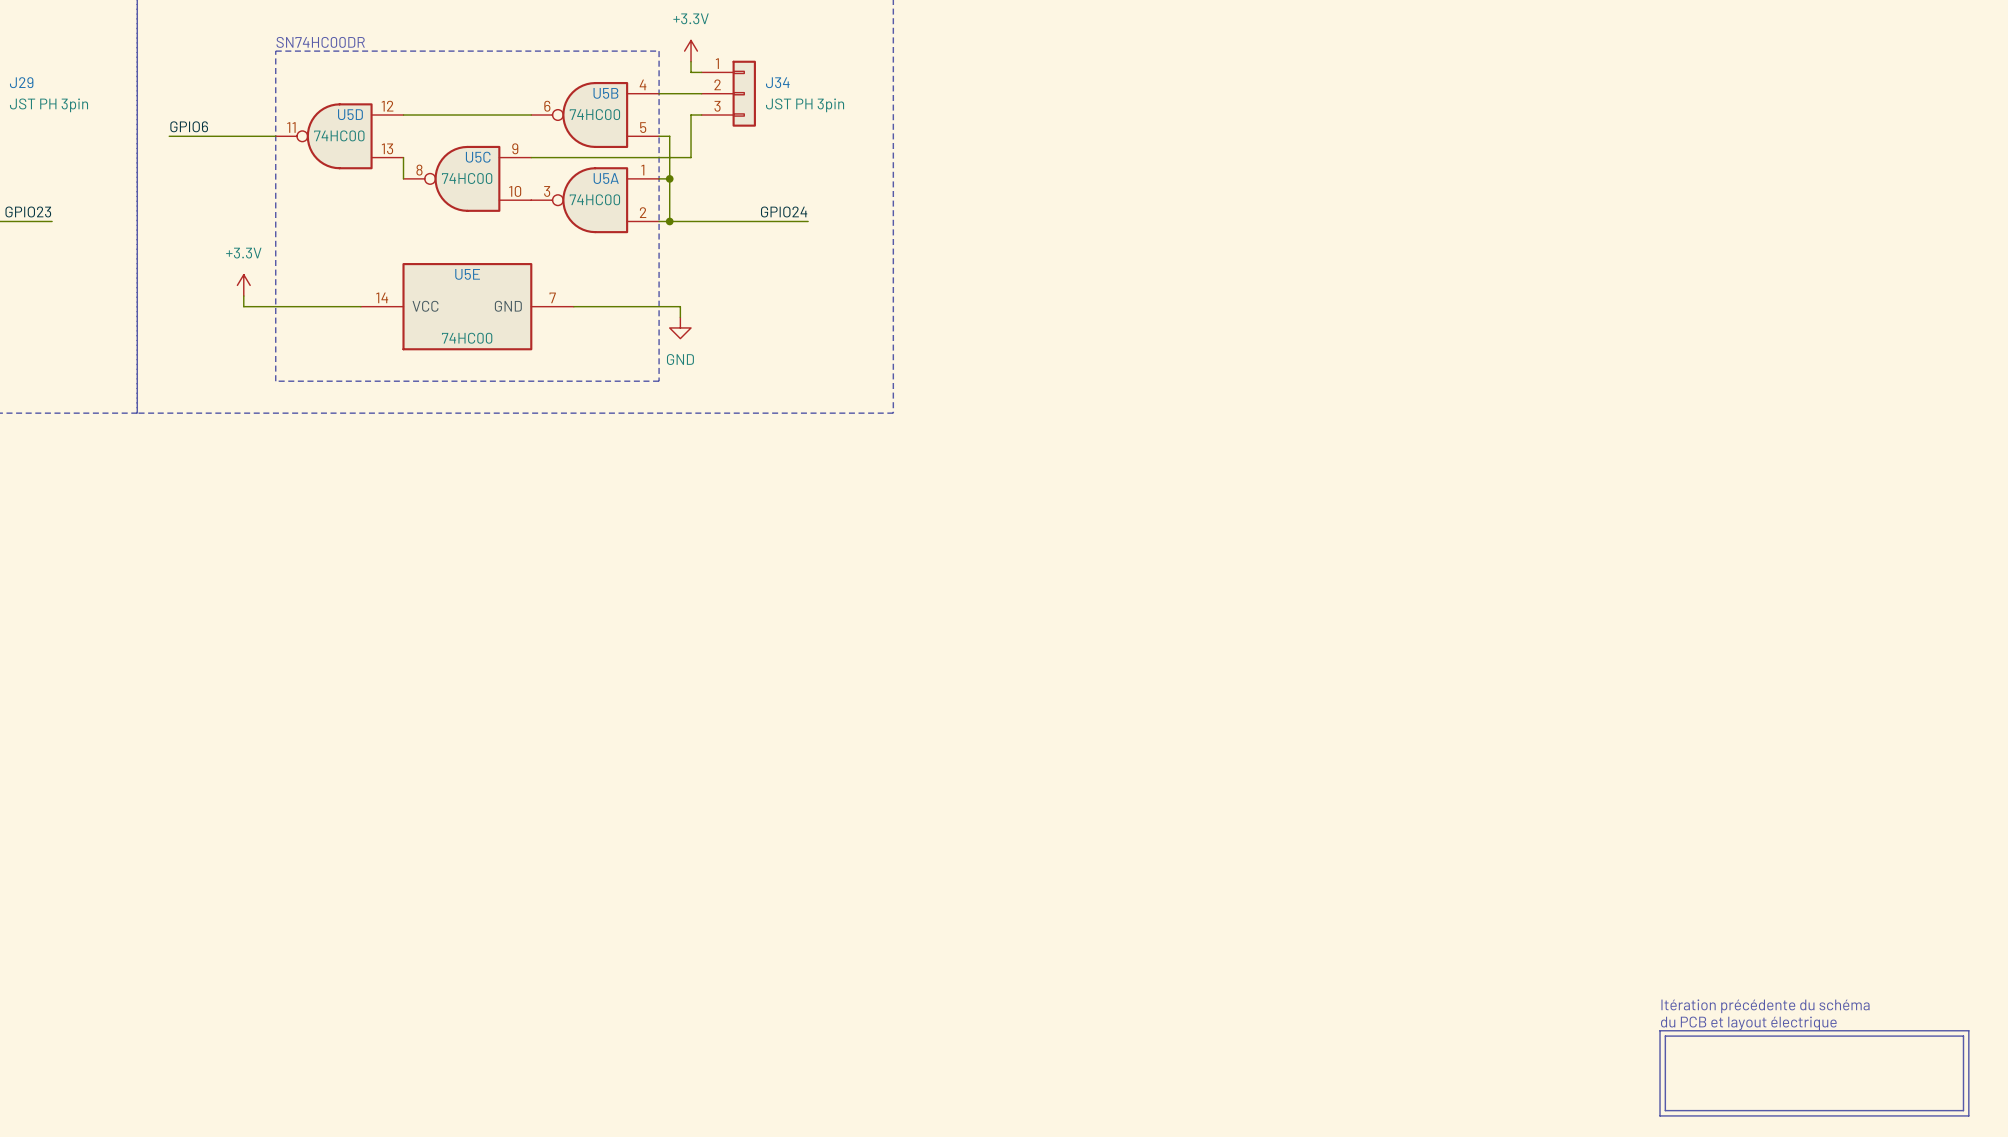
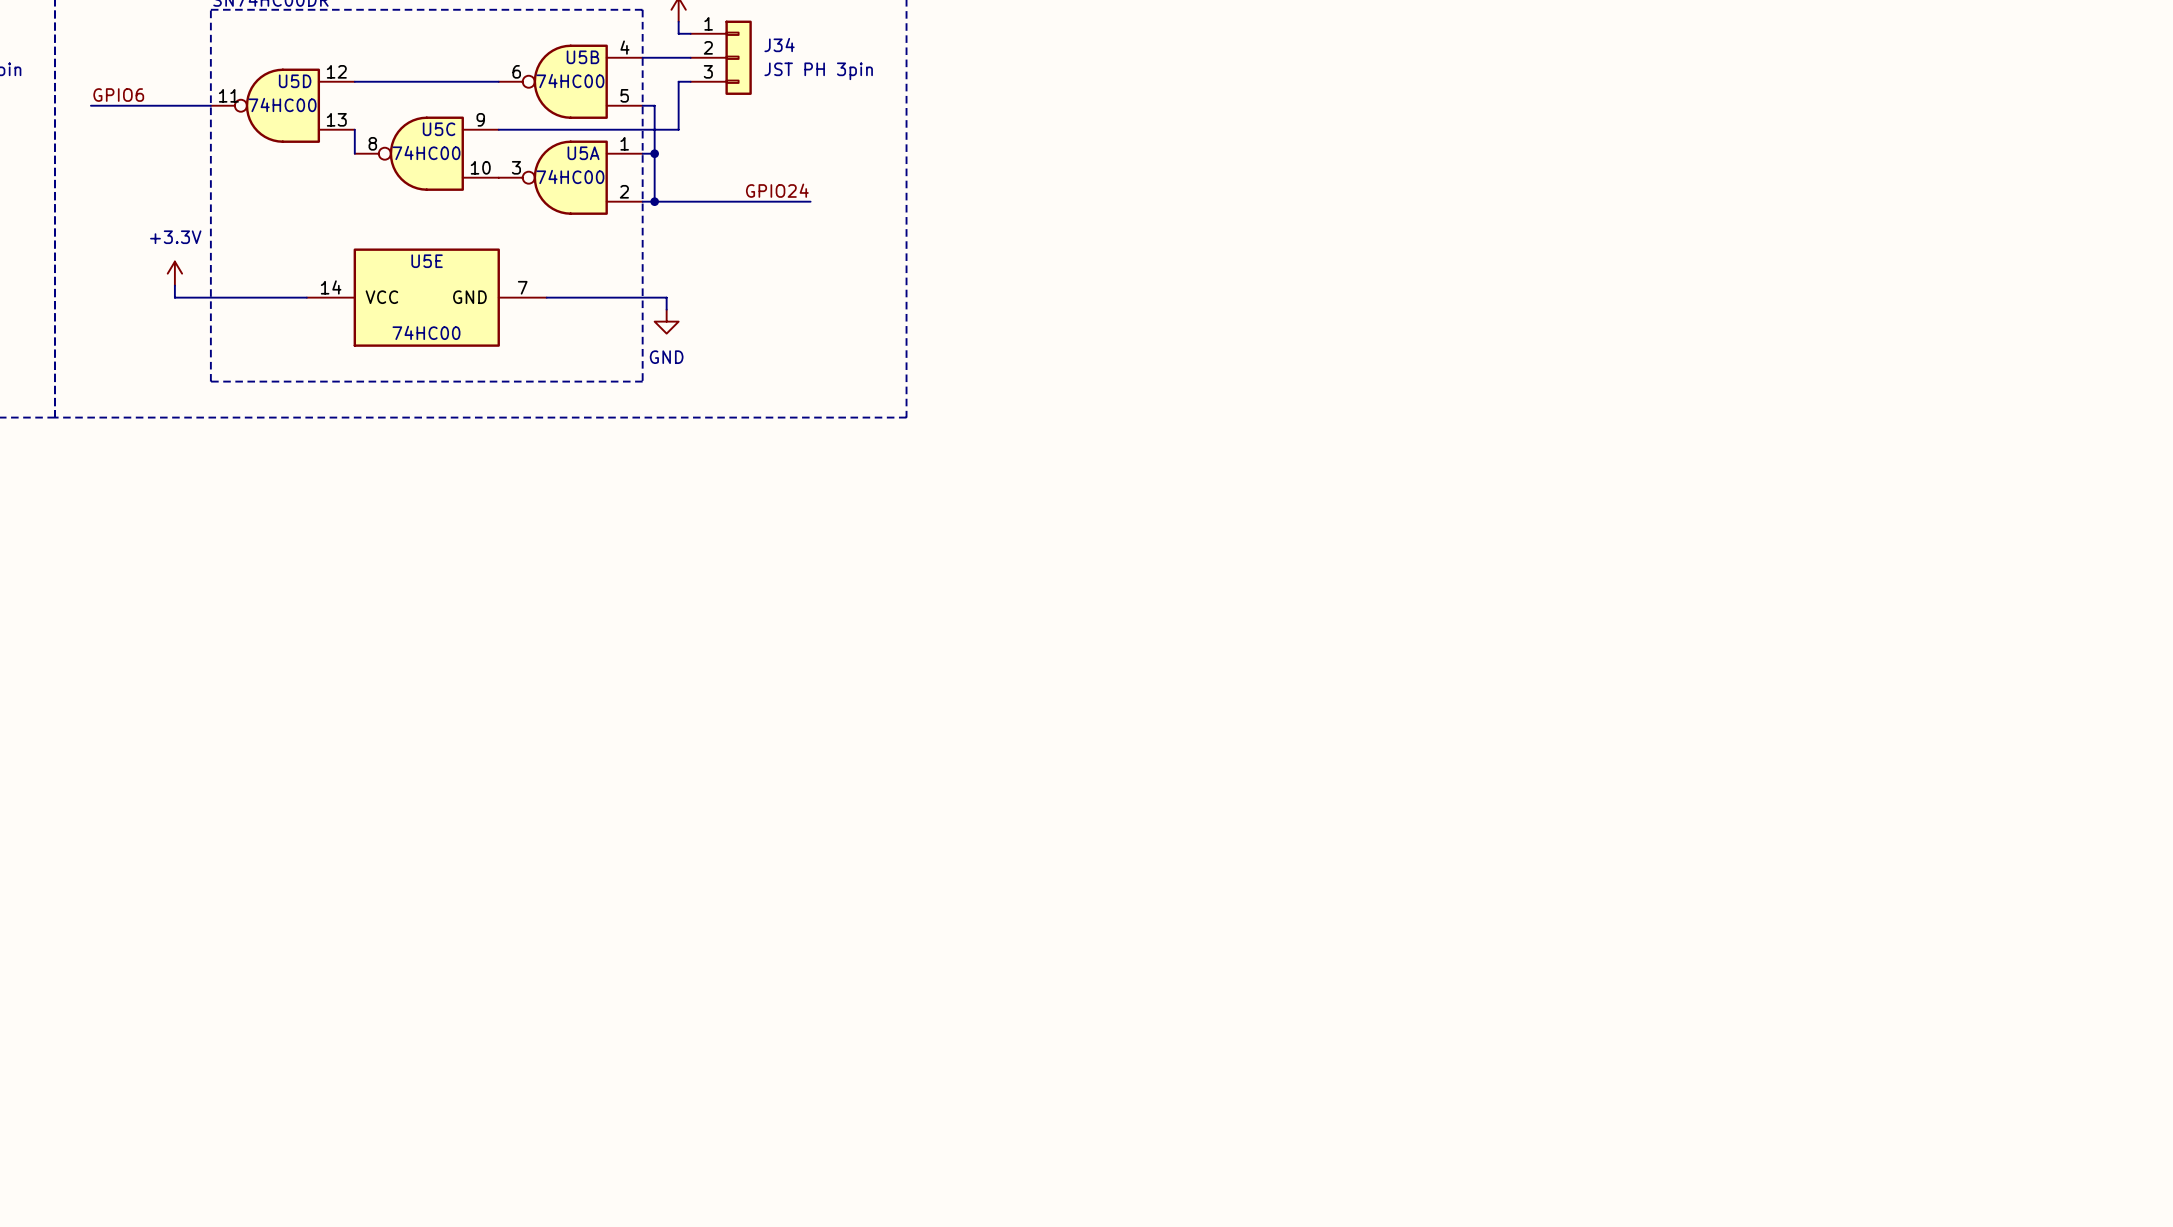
text: Itération précédente du schéma (1765, 1006) -> none
text: du PCB et layout électrique (1748, 1023) -> none
line: (1660, 1030) (1968, 1030) (1968, 1115) (1660, 1115) (1660, 1030) -> none
line: (1665, 1036) (1963, 1036) (1963, 1110) (1665, 1110) (1665, 1036) -> none

